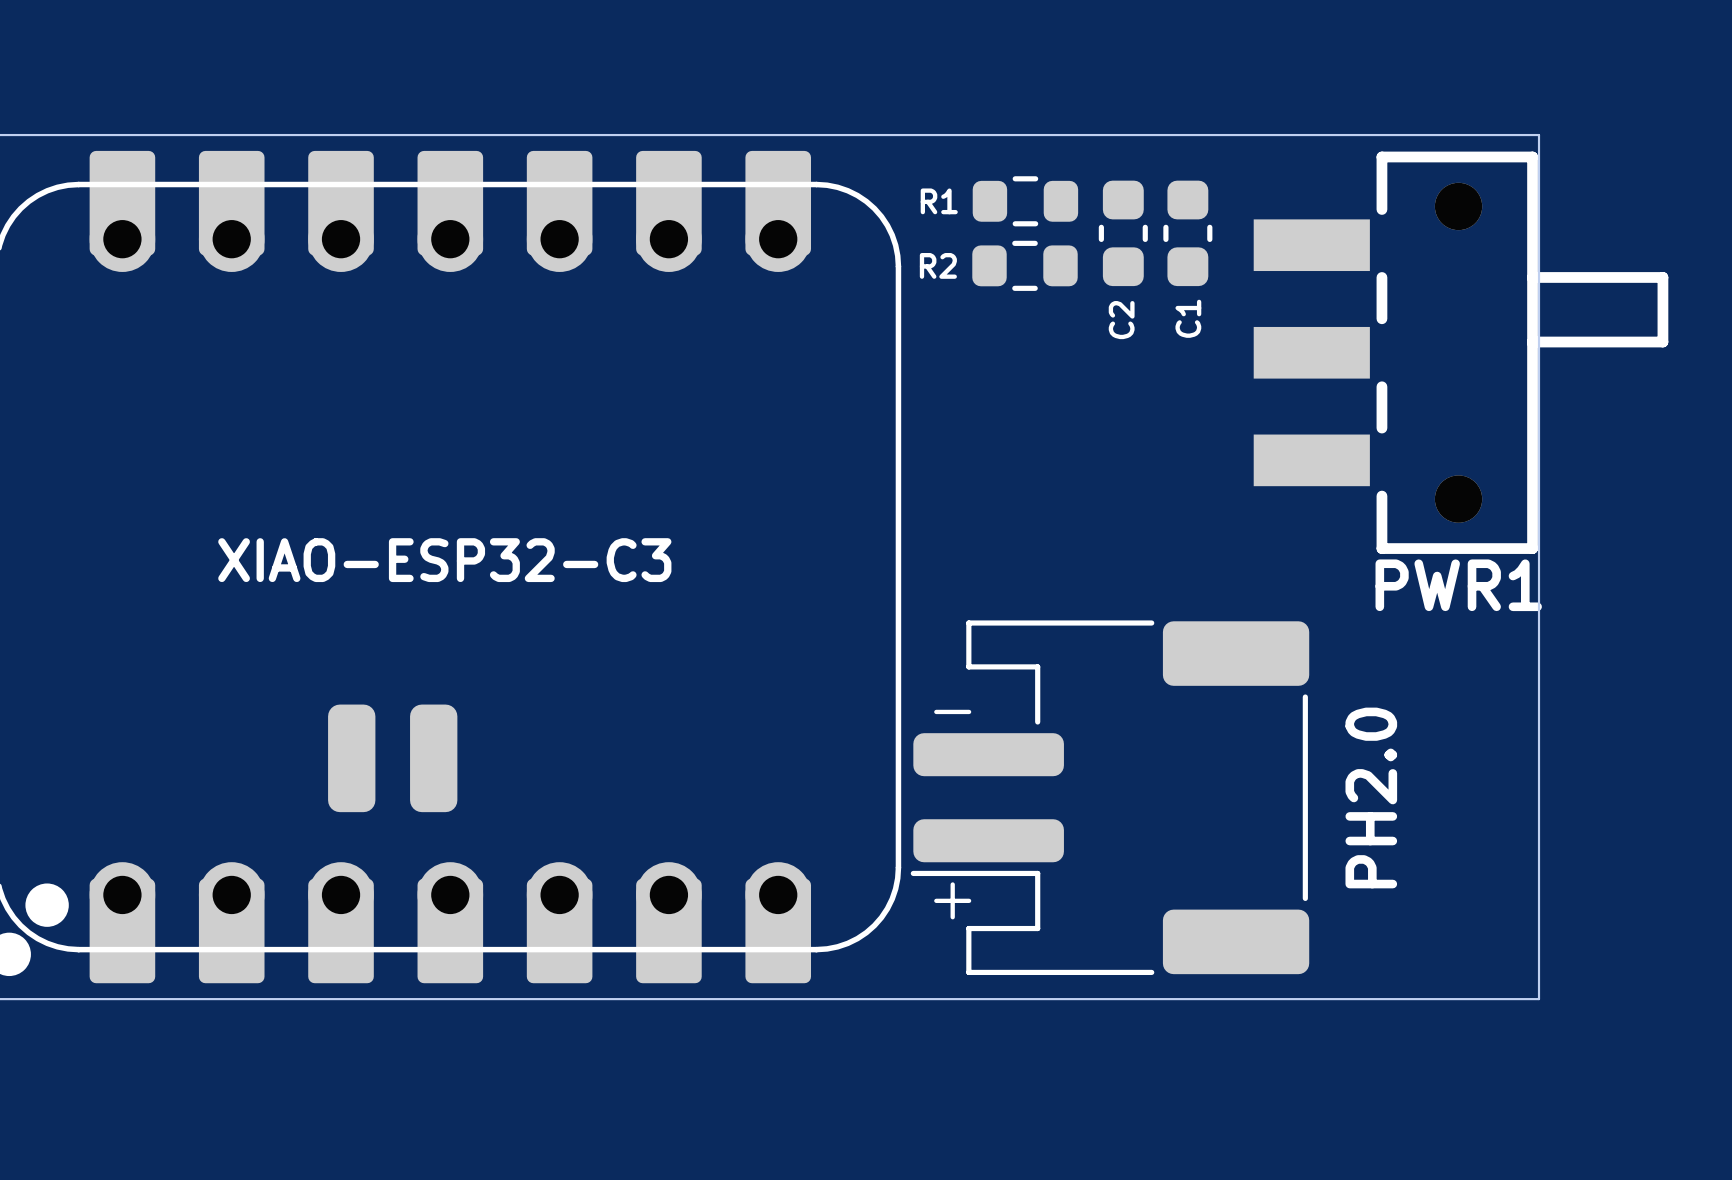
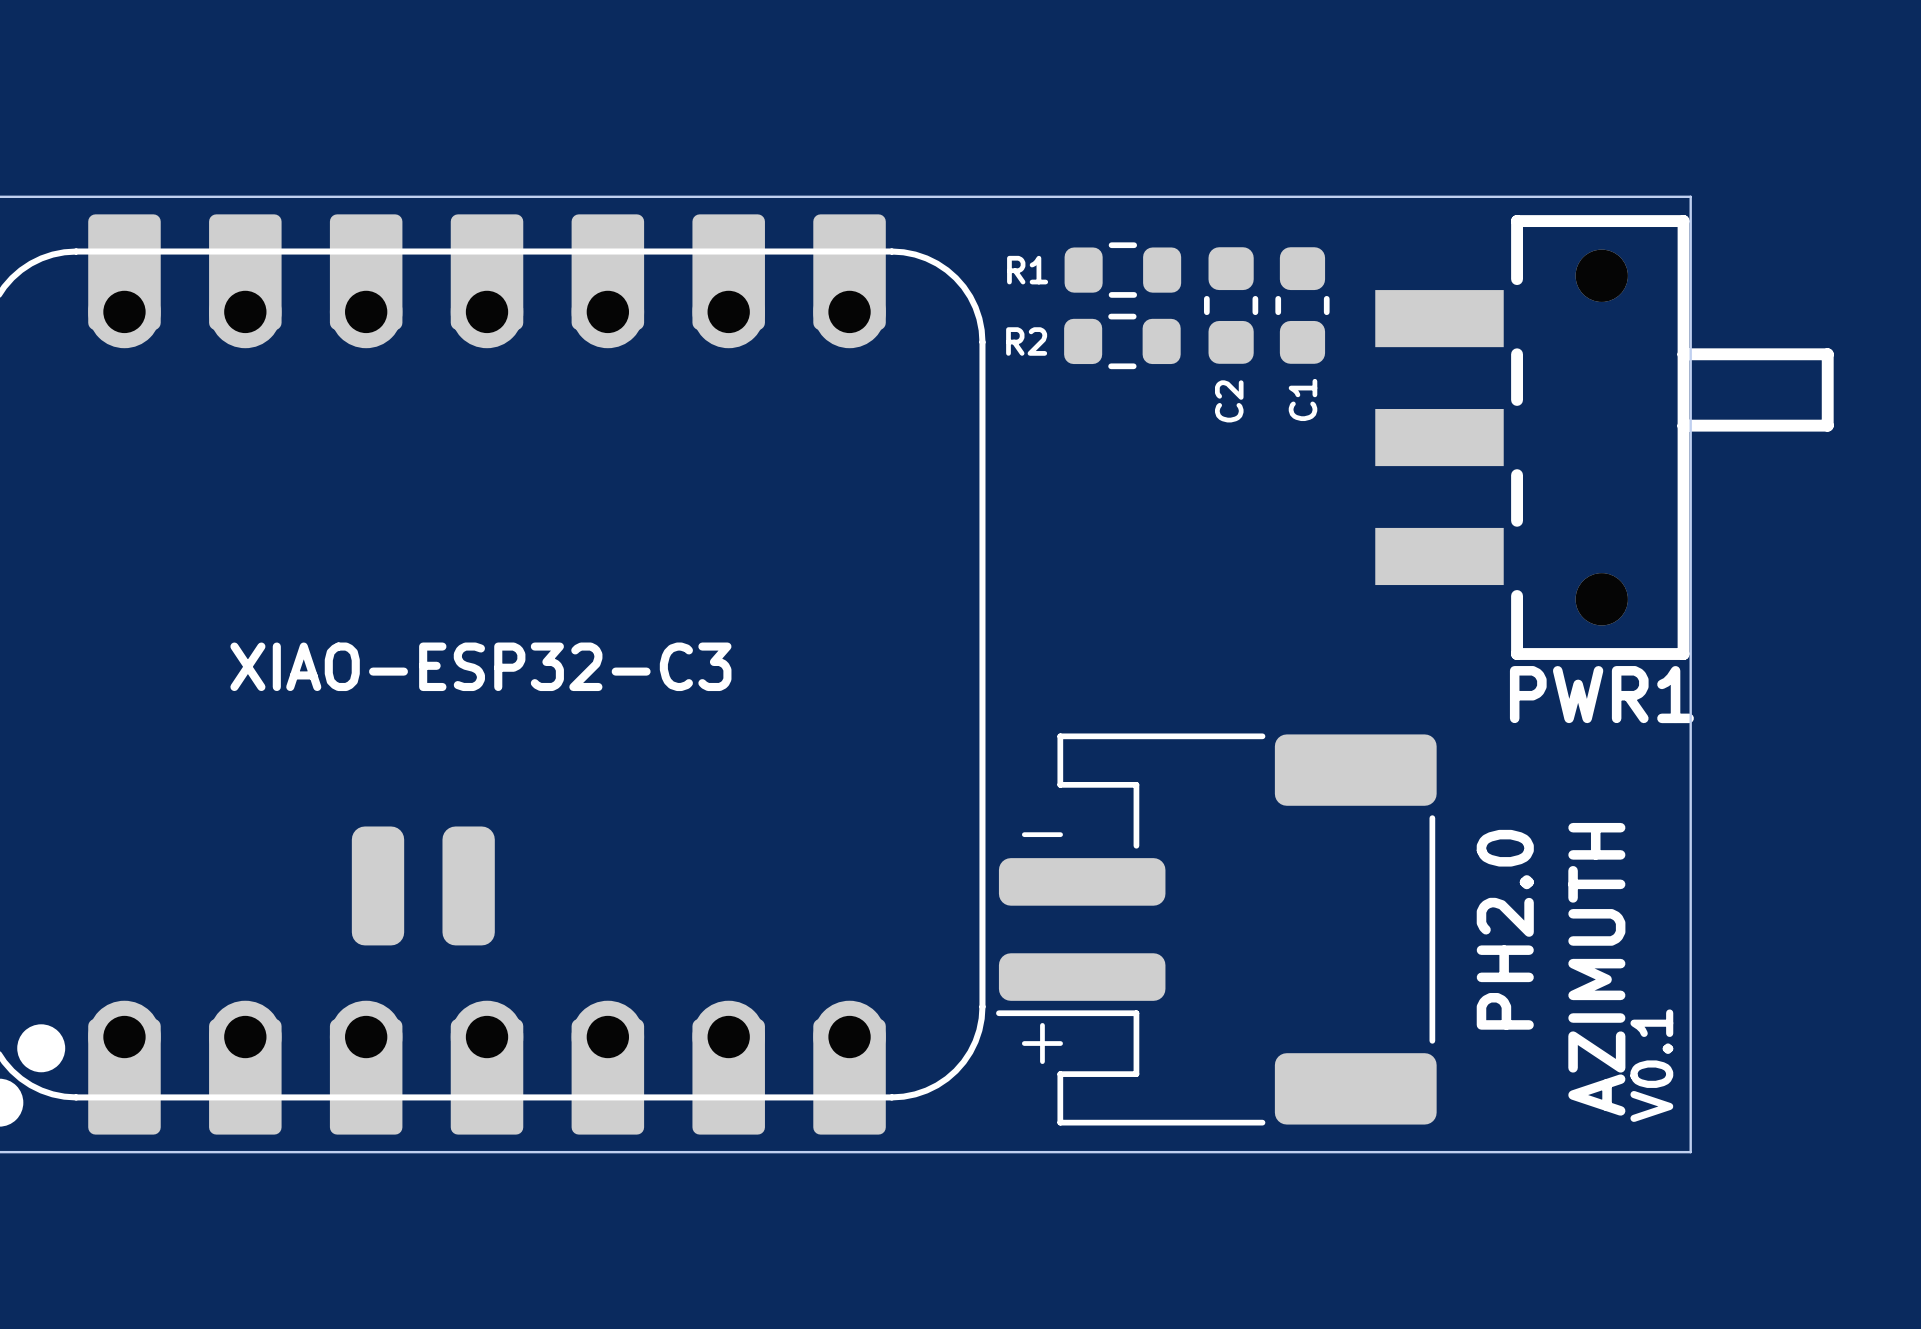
text: none -> AZIMUTH (1596, 969)
text: none -> V0.1 (1651, 1065)

